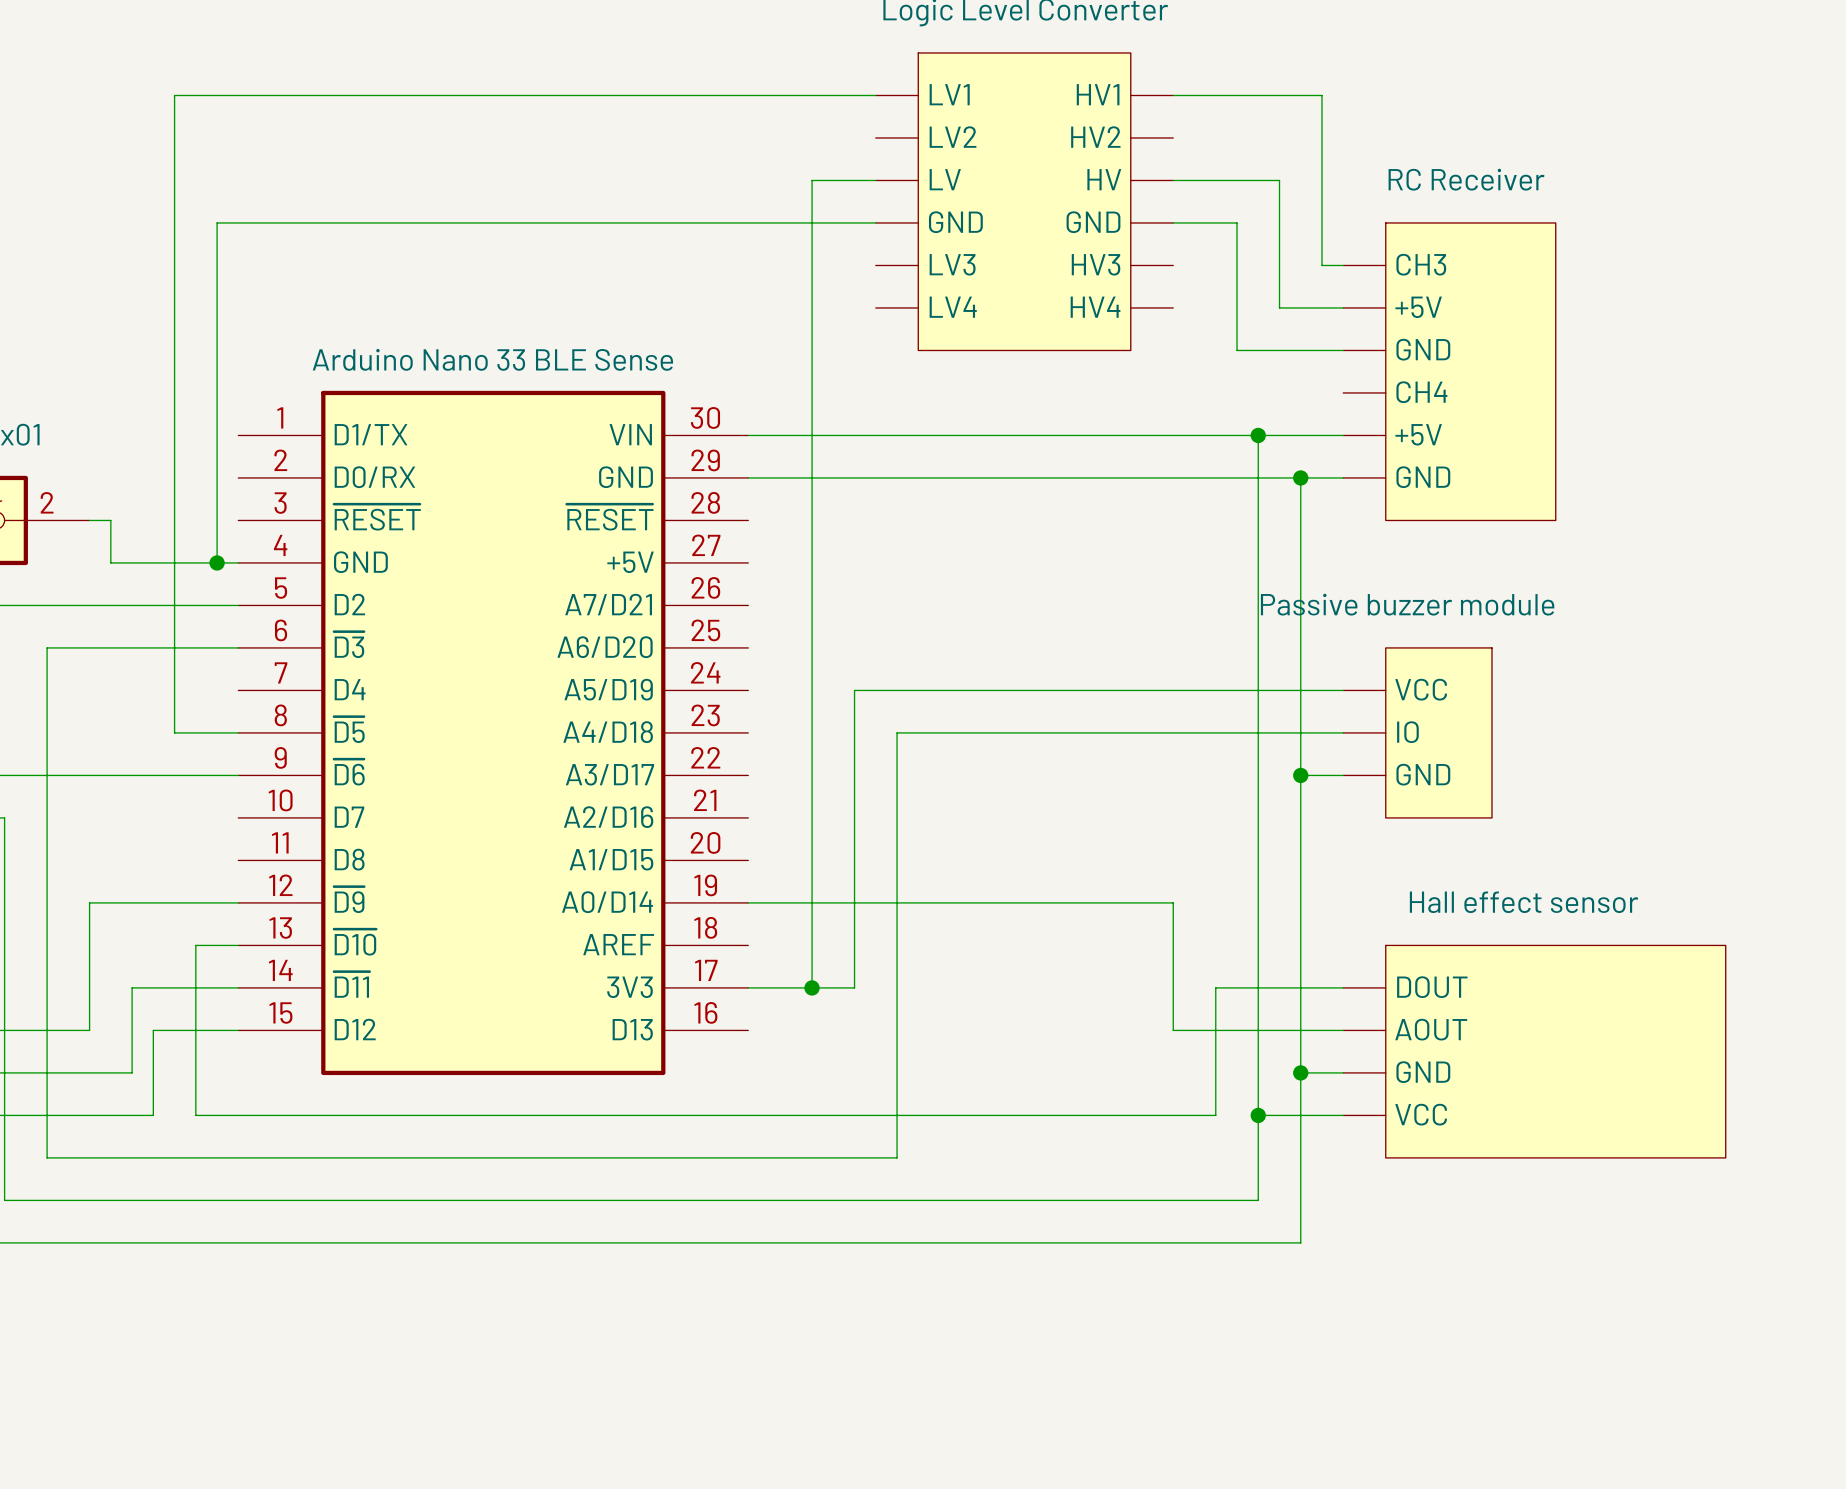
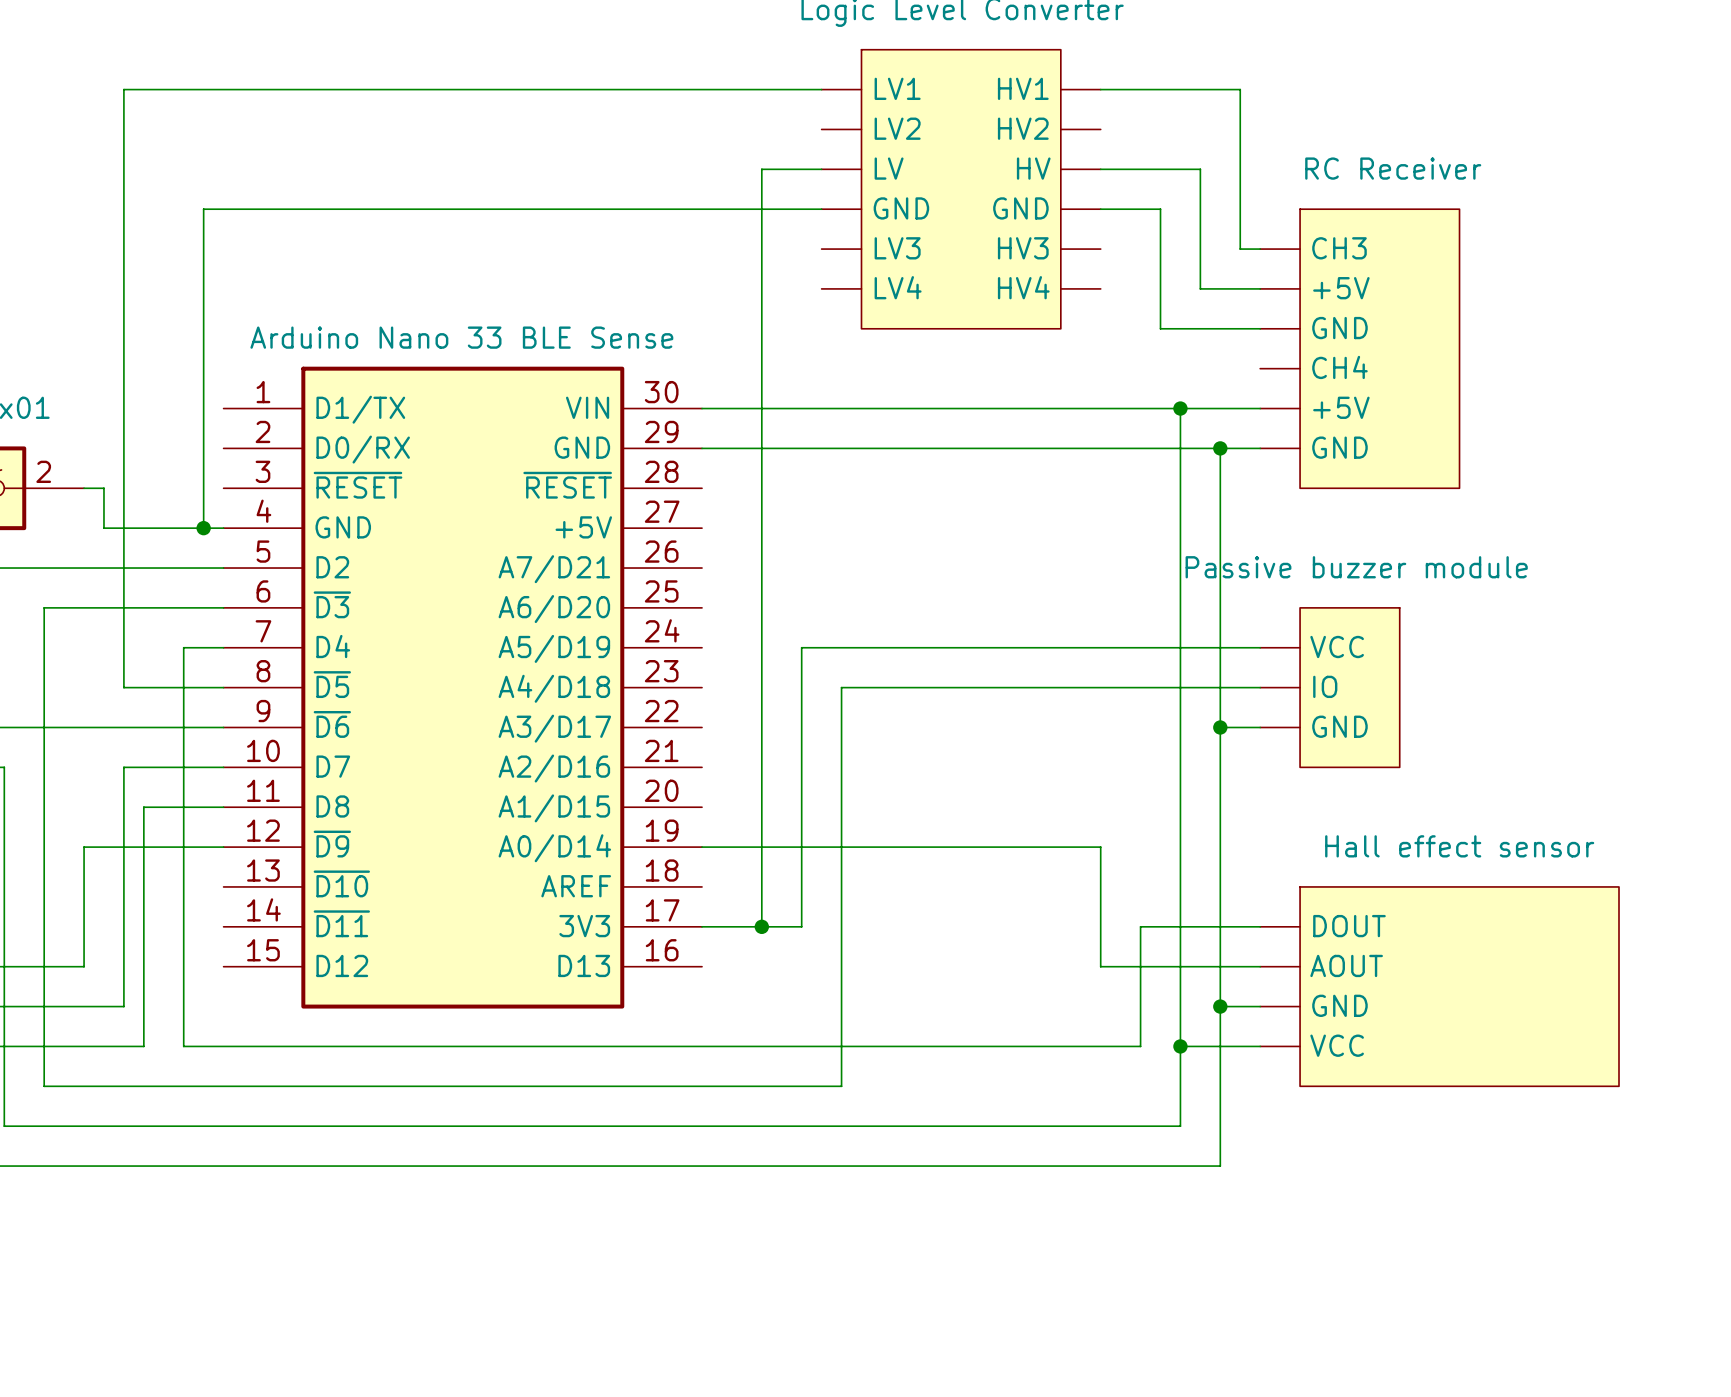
wire: (174, 95) (174, 732) -> (163, 89) (123, 89) (123, 687) (163, 687)
wire: (195, 945) (238, 945) -> (183, 886) (183, 647) (223, 647)
wire: (132, 987) (238, 987) -> (123, 926) (123, 767) (223, 767)
wire: (153, 1030) (238, 1030) -> (143, 966) (143, 807) (223, 807)

